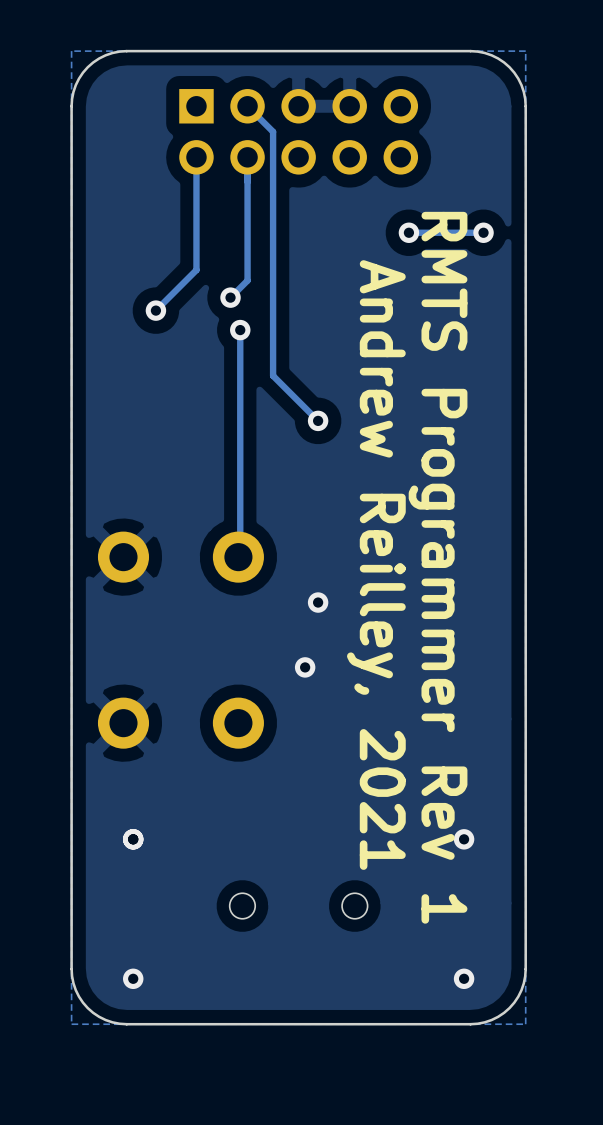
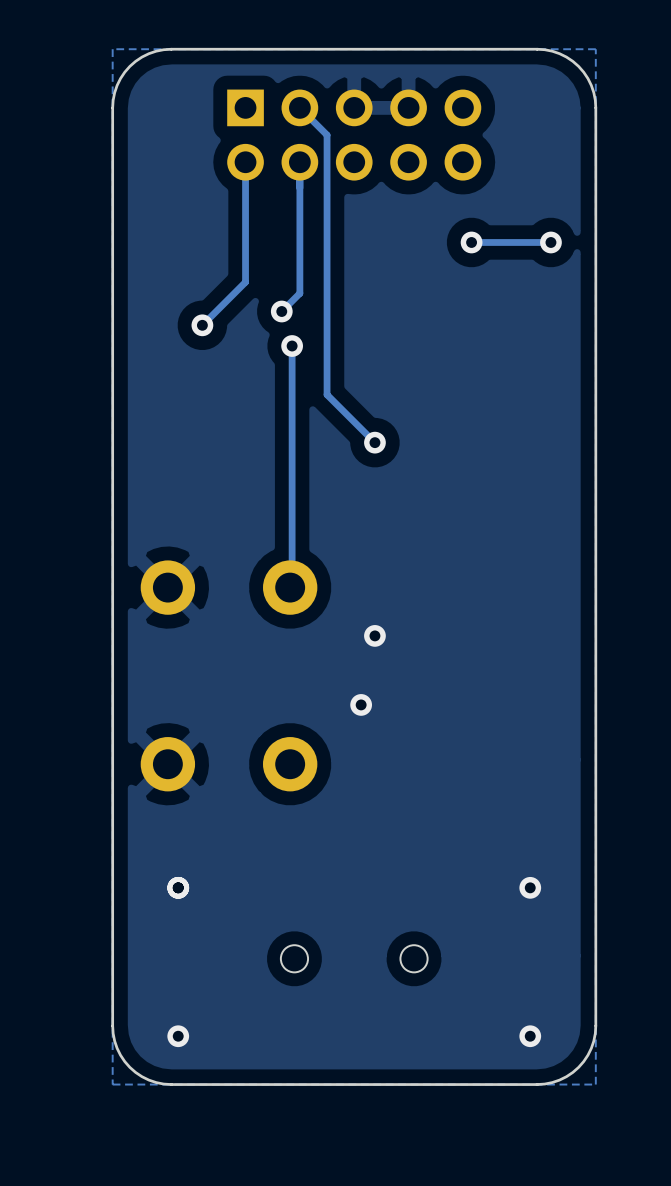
text: Andrew Reilley, 2021 (376, 565) -> none
text: RMTS Programmer Rev 1 (438, 567) -> none

